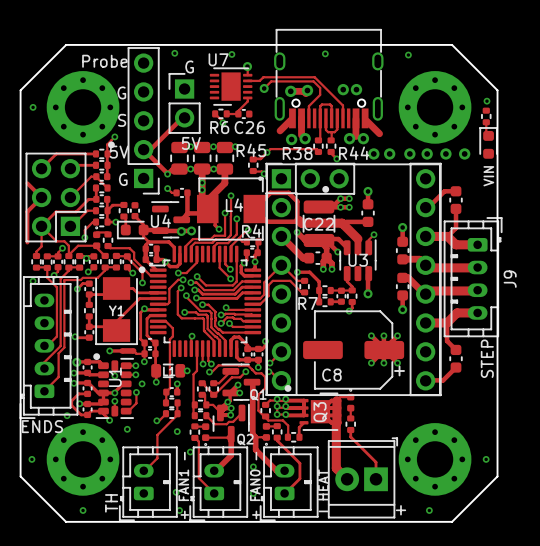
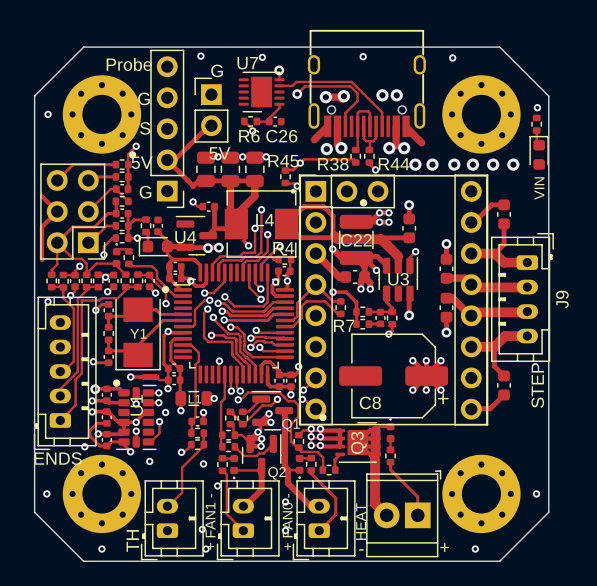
via: (190, 169) -> none
via: (213, 169) -> none
via: (167, 174) -> none
via: (202, 182) -> none
via: (202, 190) -> none

